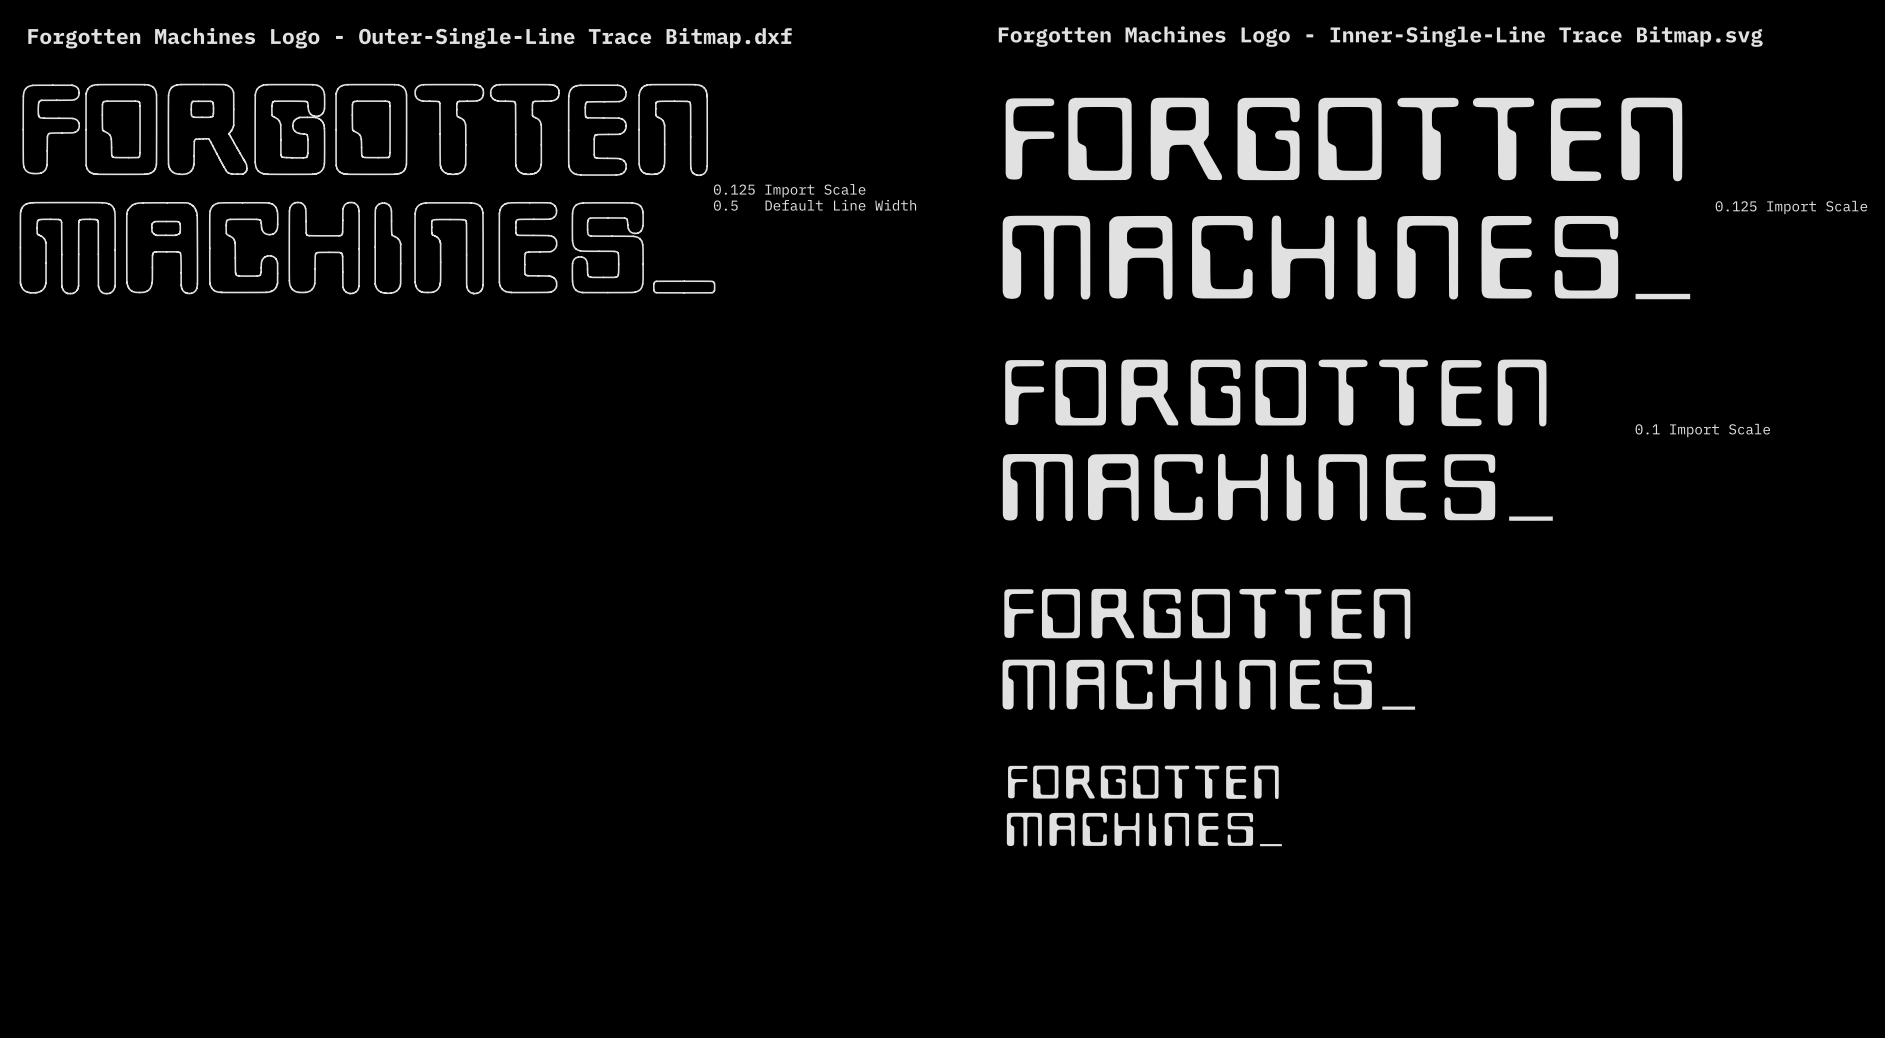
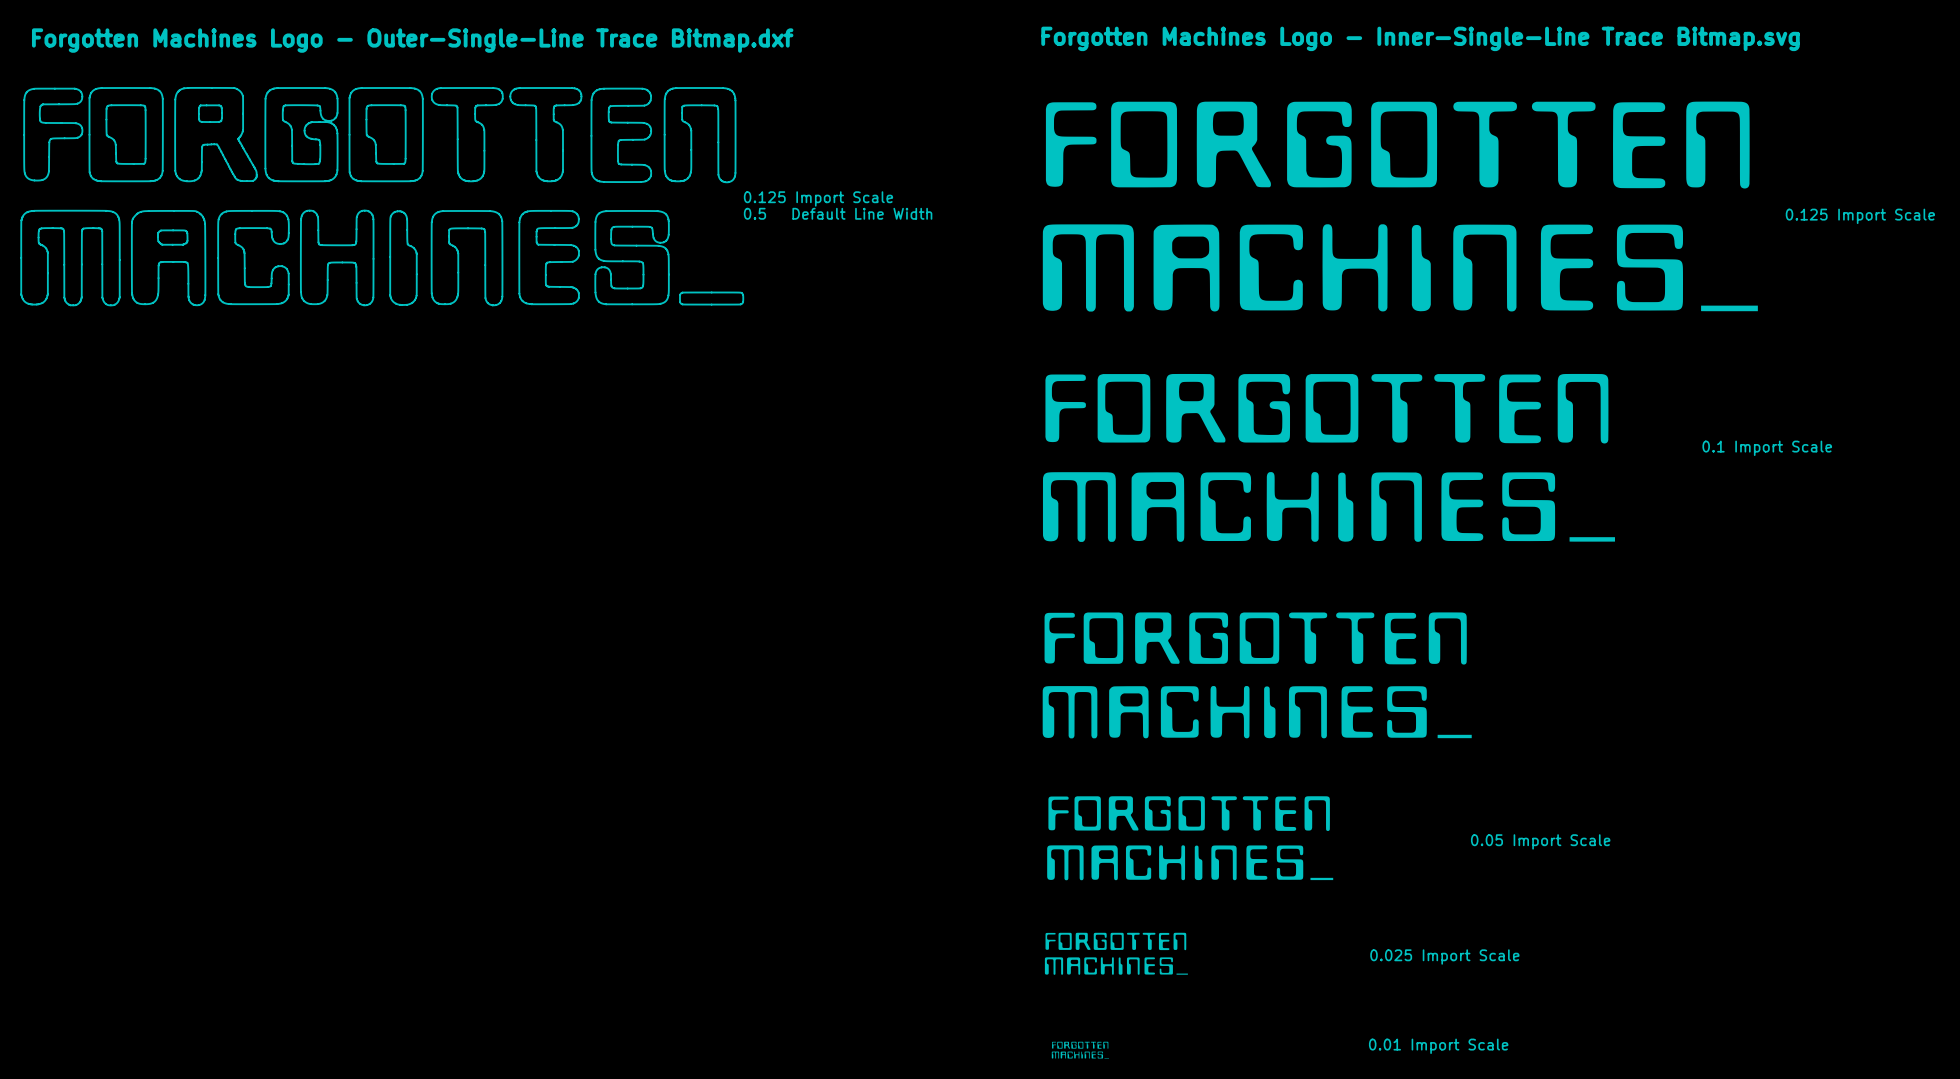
text: none -> 0.05 Import Scale (1540, 841)
drawing: none -> [1044, 932, 1188, 975]
text: none -> 0.025 Import Scale (1444, 956)
drawing: none -> [1051, 1041, 1110, 1059]
text: none -> 0.01 Import Scale (1438, 1046)

